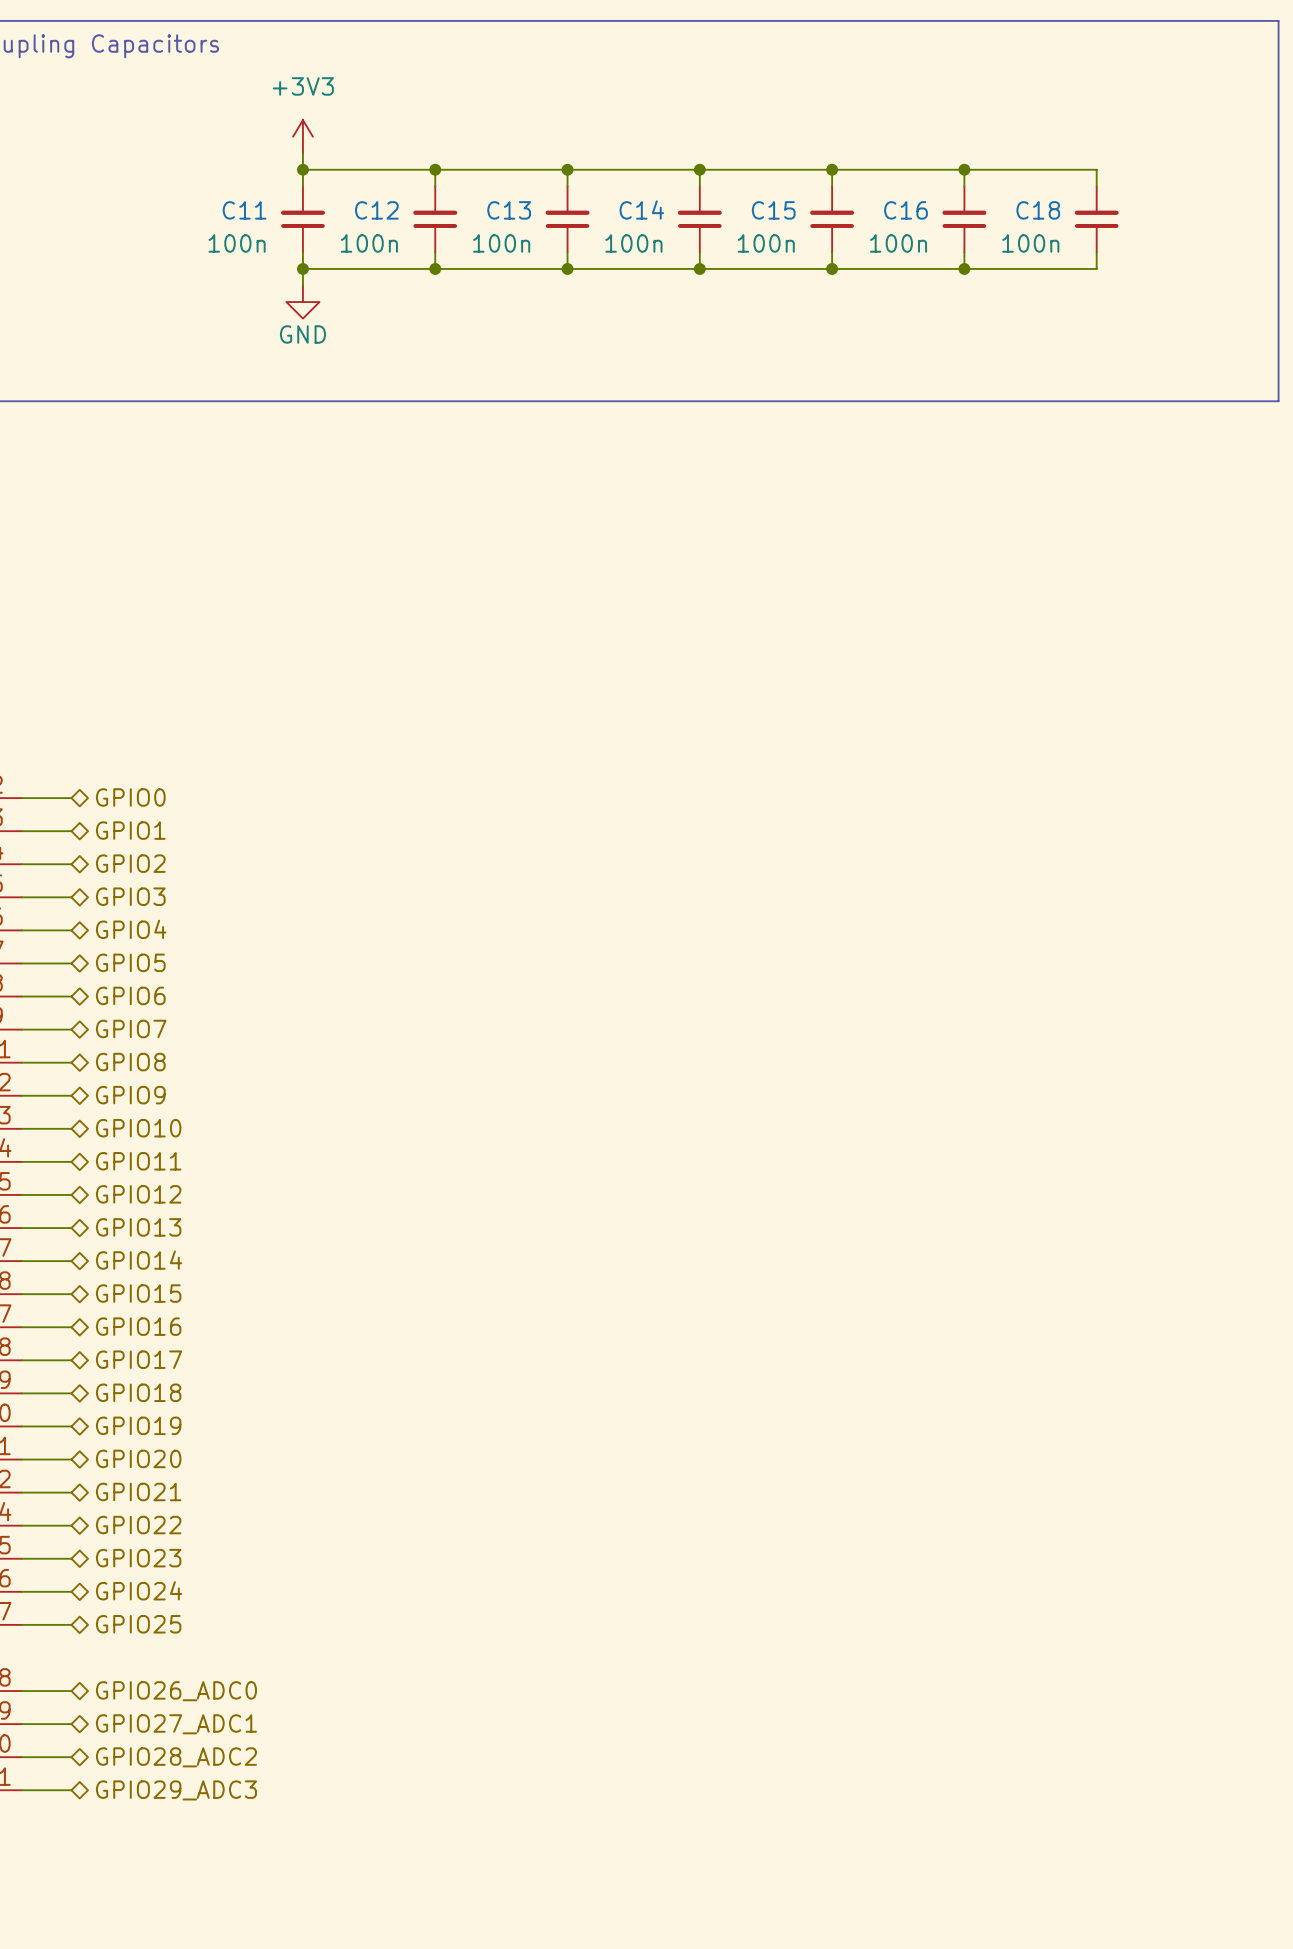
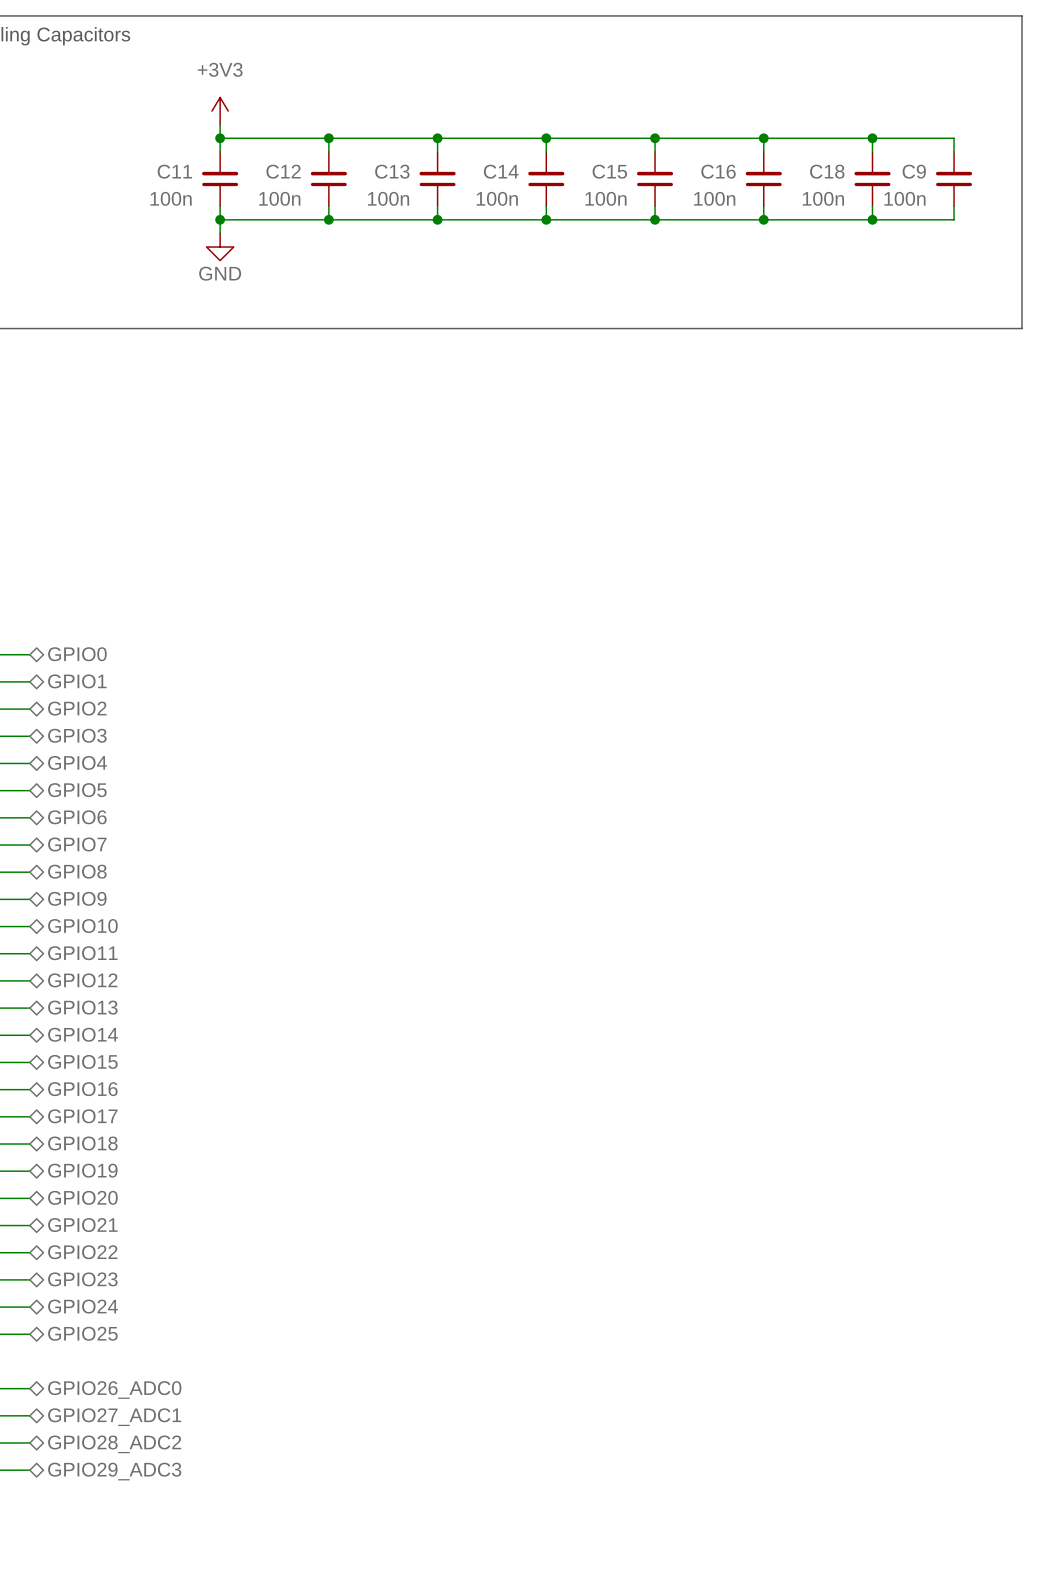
wire: none -> (872, 138) (954, 138) (954, 151)
junction: none -> (872, 138)
C9: none -> 100n (954, 179)
wire: none -> (954, 206) (954, 219) (872, 219)
junction: none -> (872, 219)

